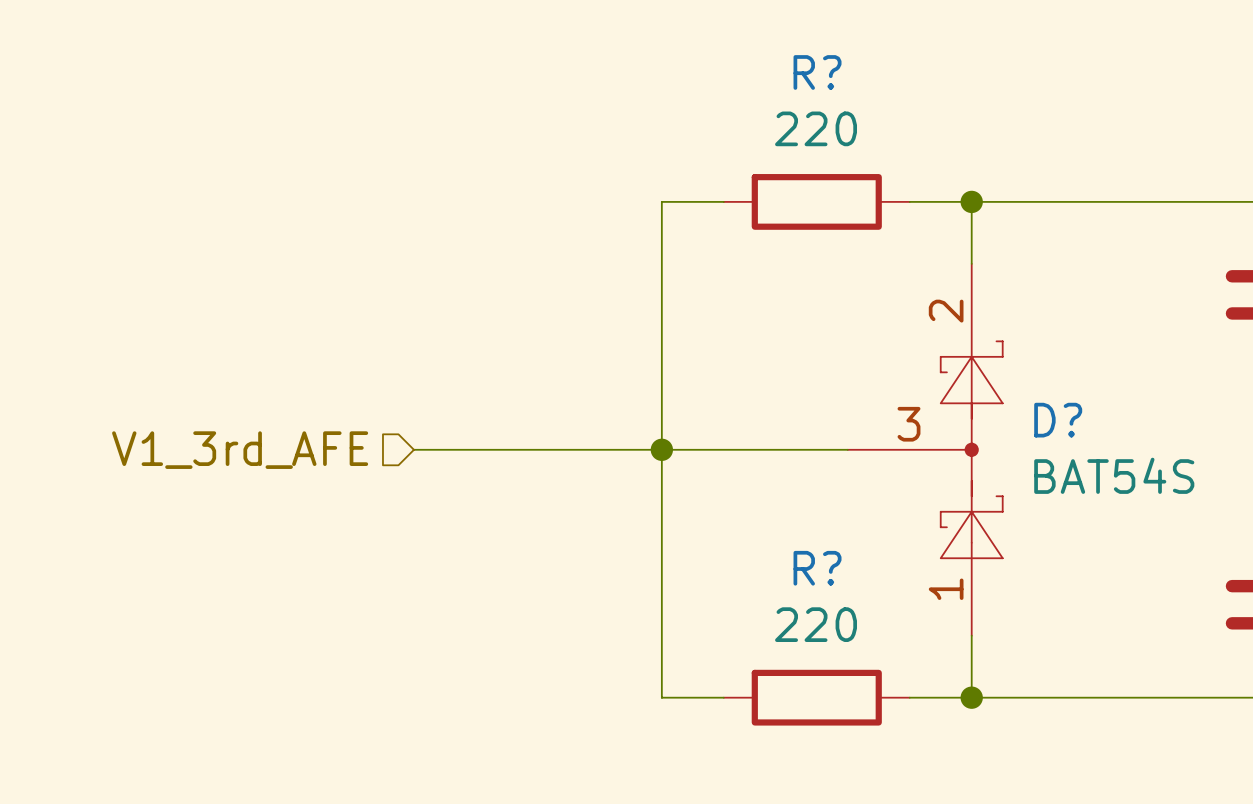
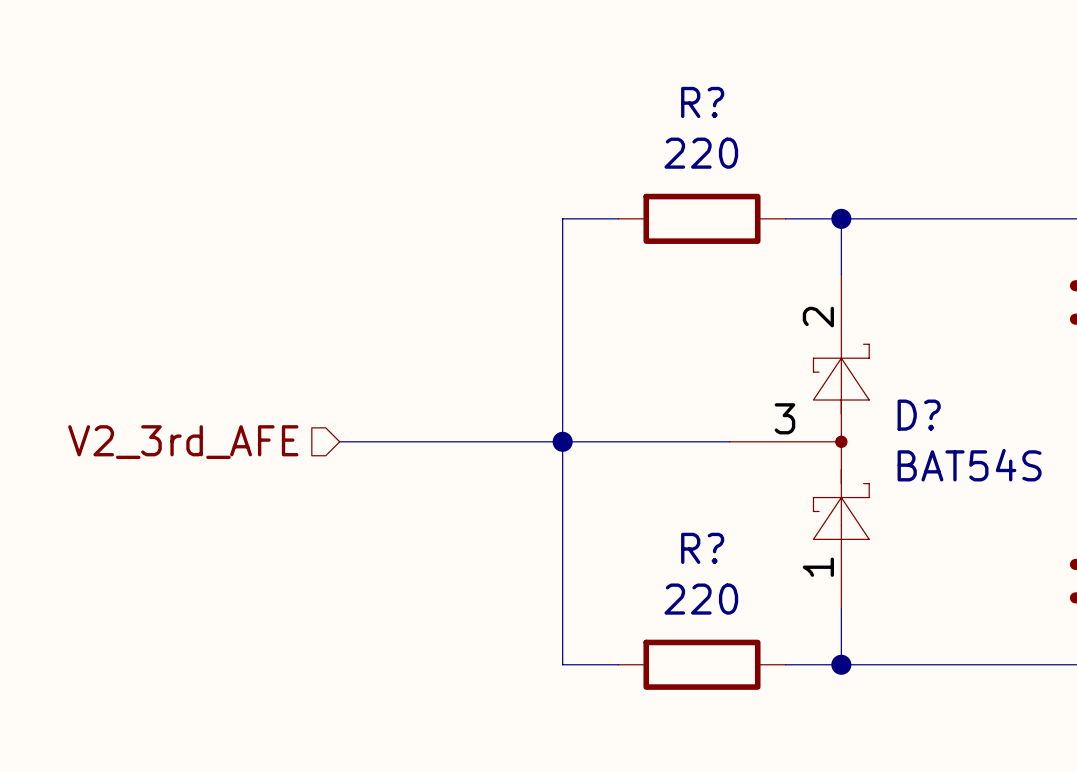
hierarchical label: V1_3rd_AFE (240, 450) -> V2_3rd_AFE (183, 442)

